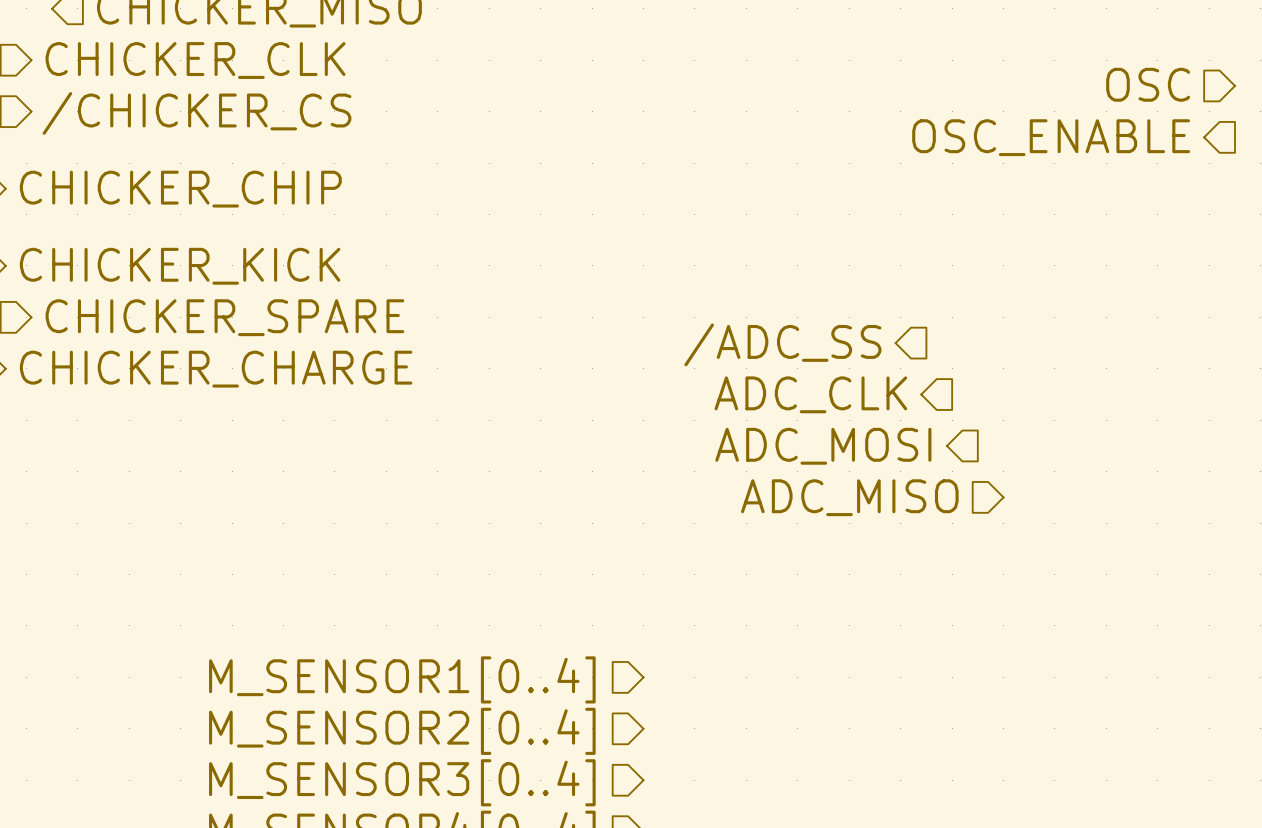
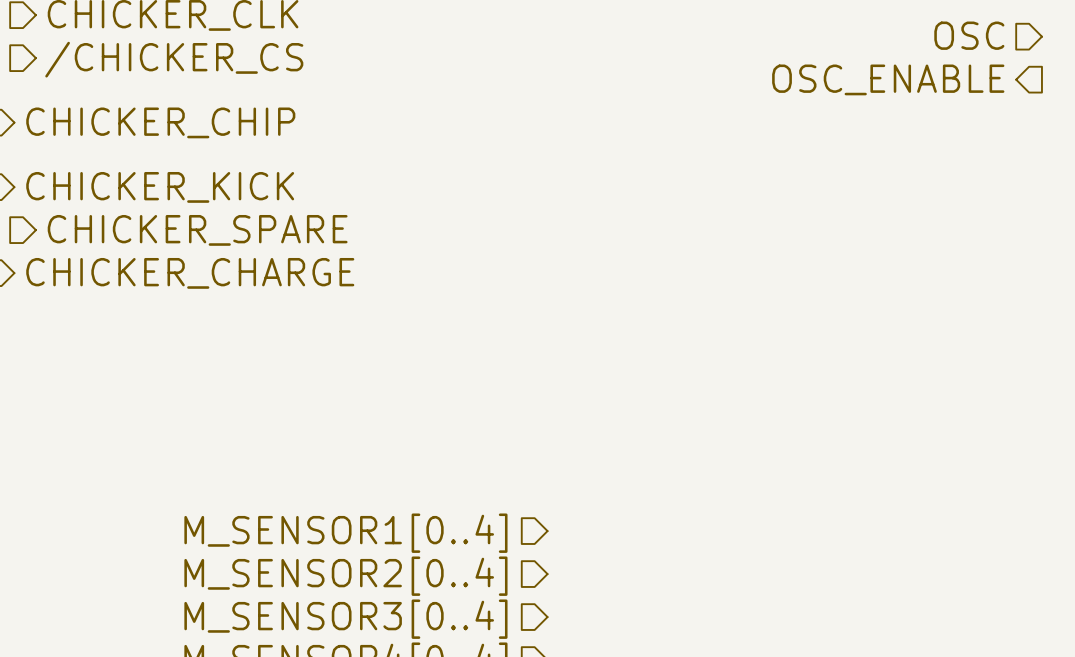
hierarchical label: /ADC_SS (782, 344) -> none
hierarchical label: ADC_CLK (810, 394) -> none
hierarchical label: ADC_MOSI (823, 446) -> none
hierarchical label: ADC_MISO (849, 497) -> none

